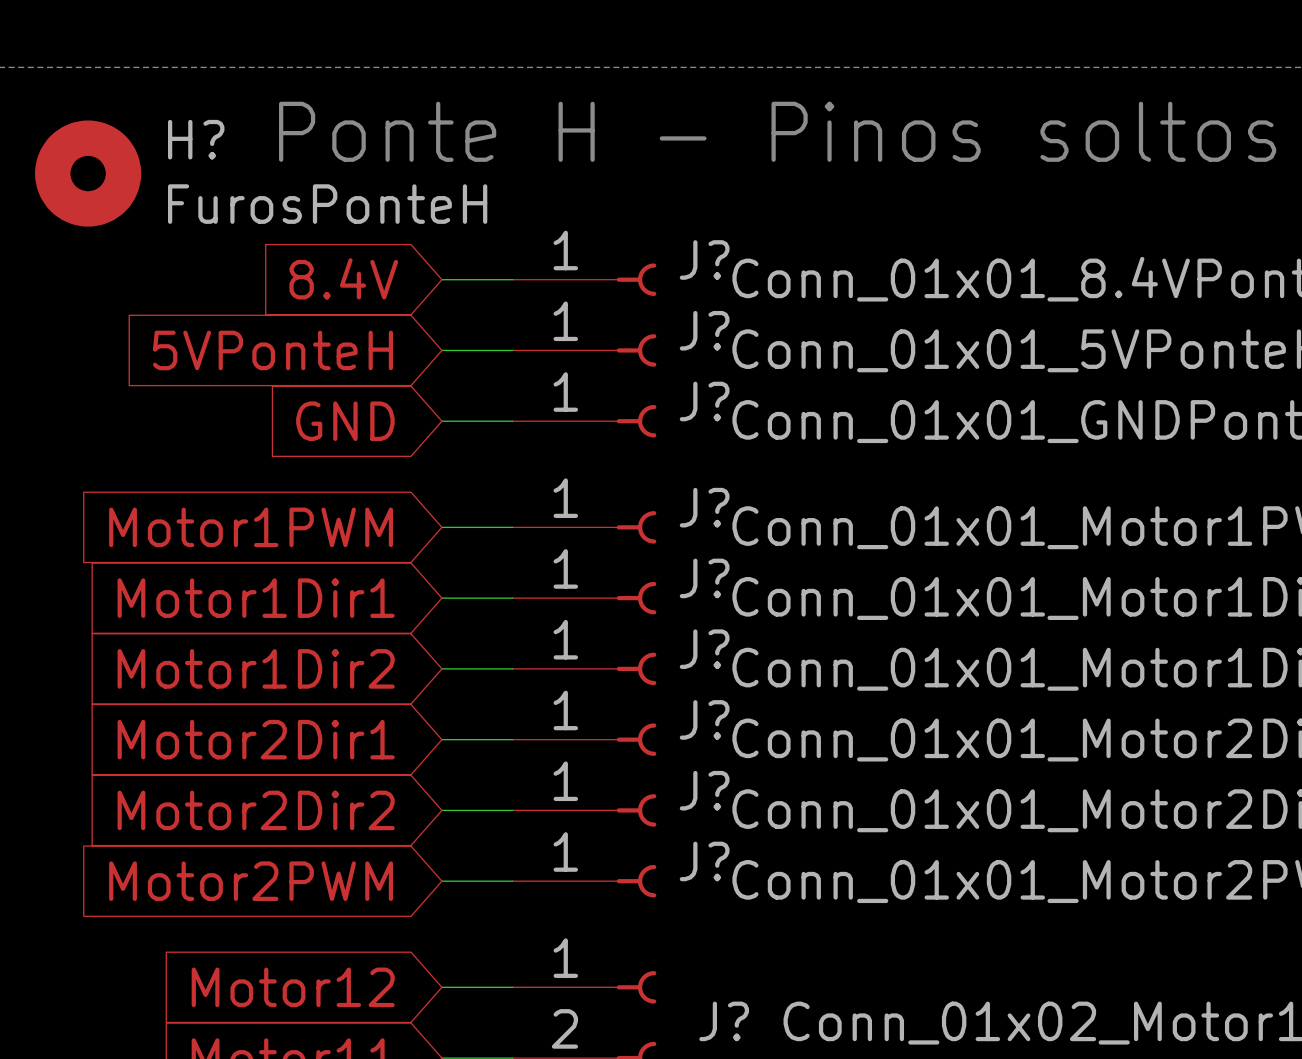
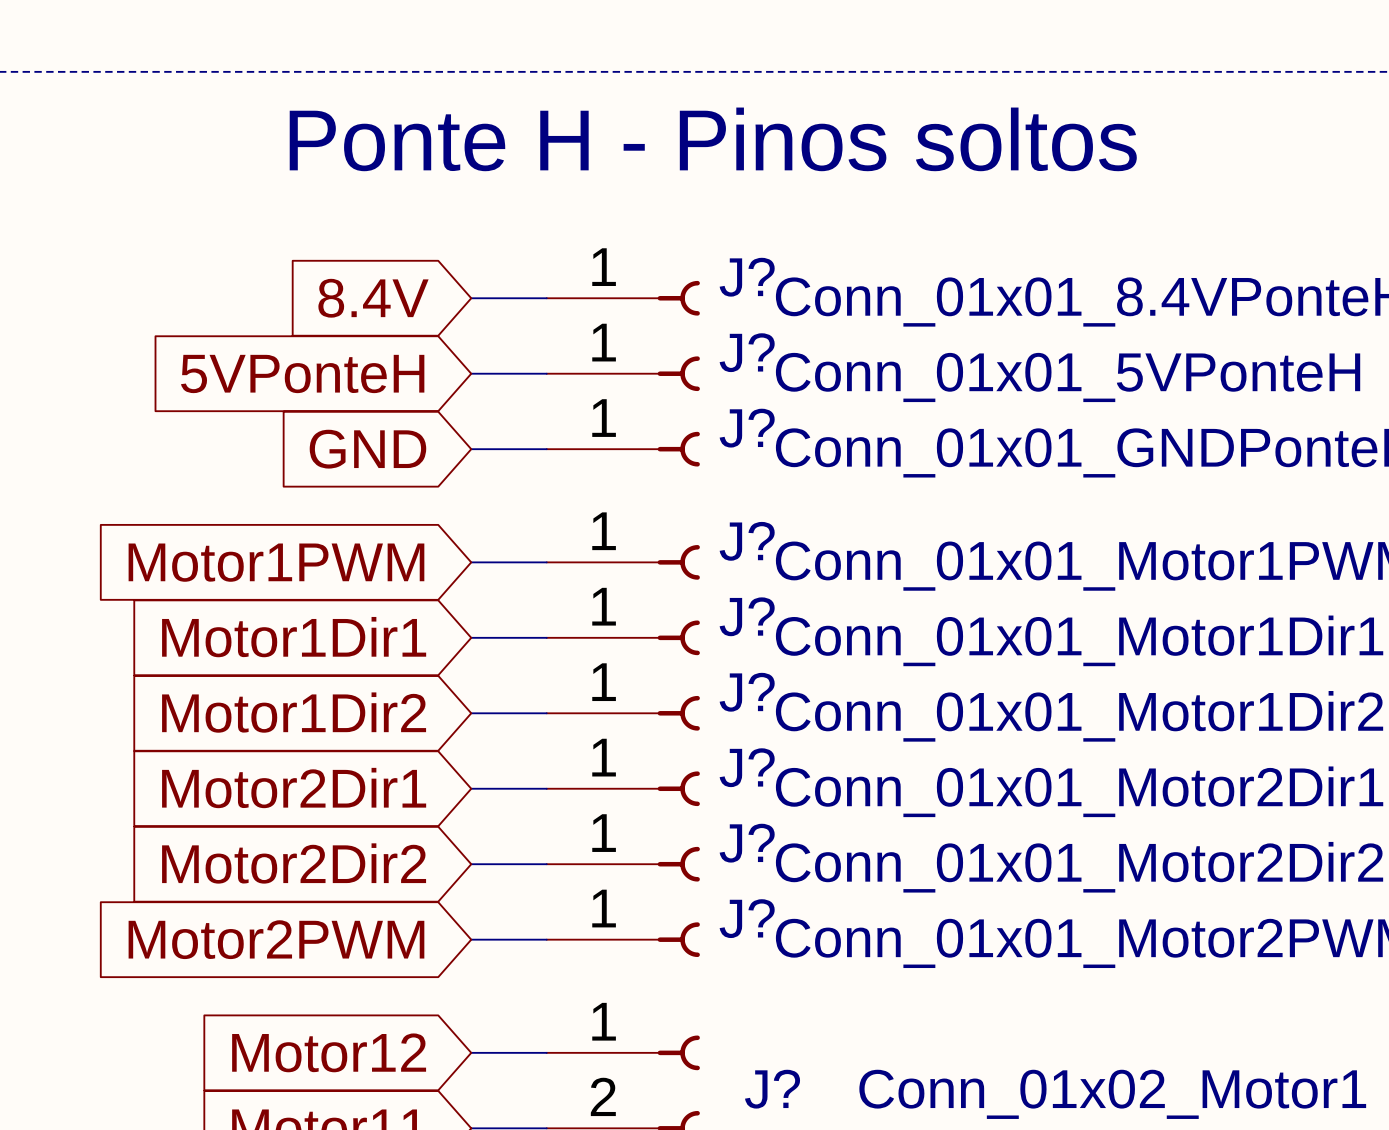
H?: FurosPonteH (88, 173) -> none

